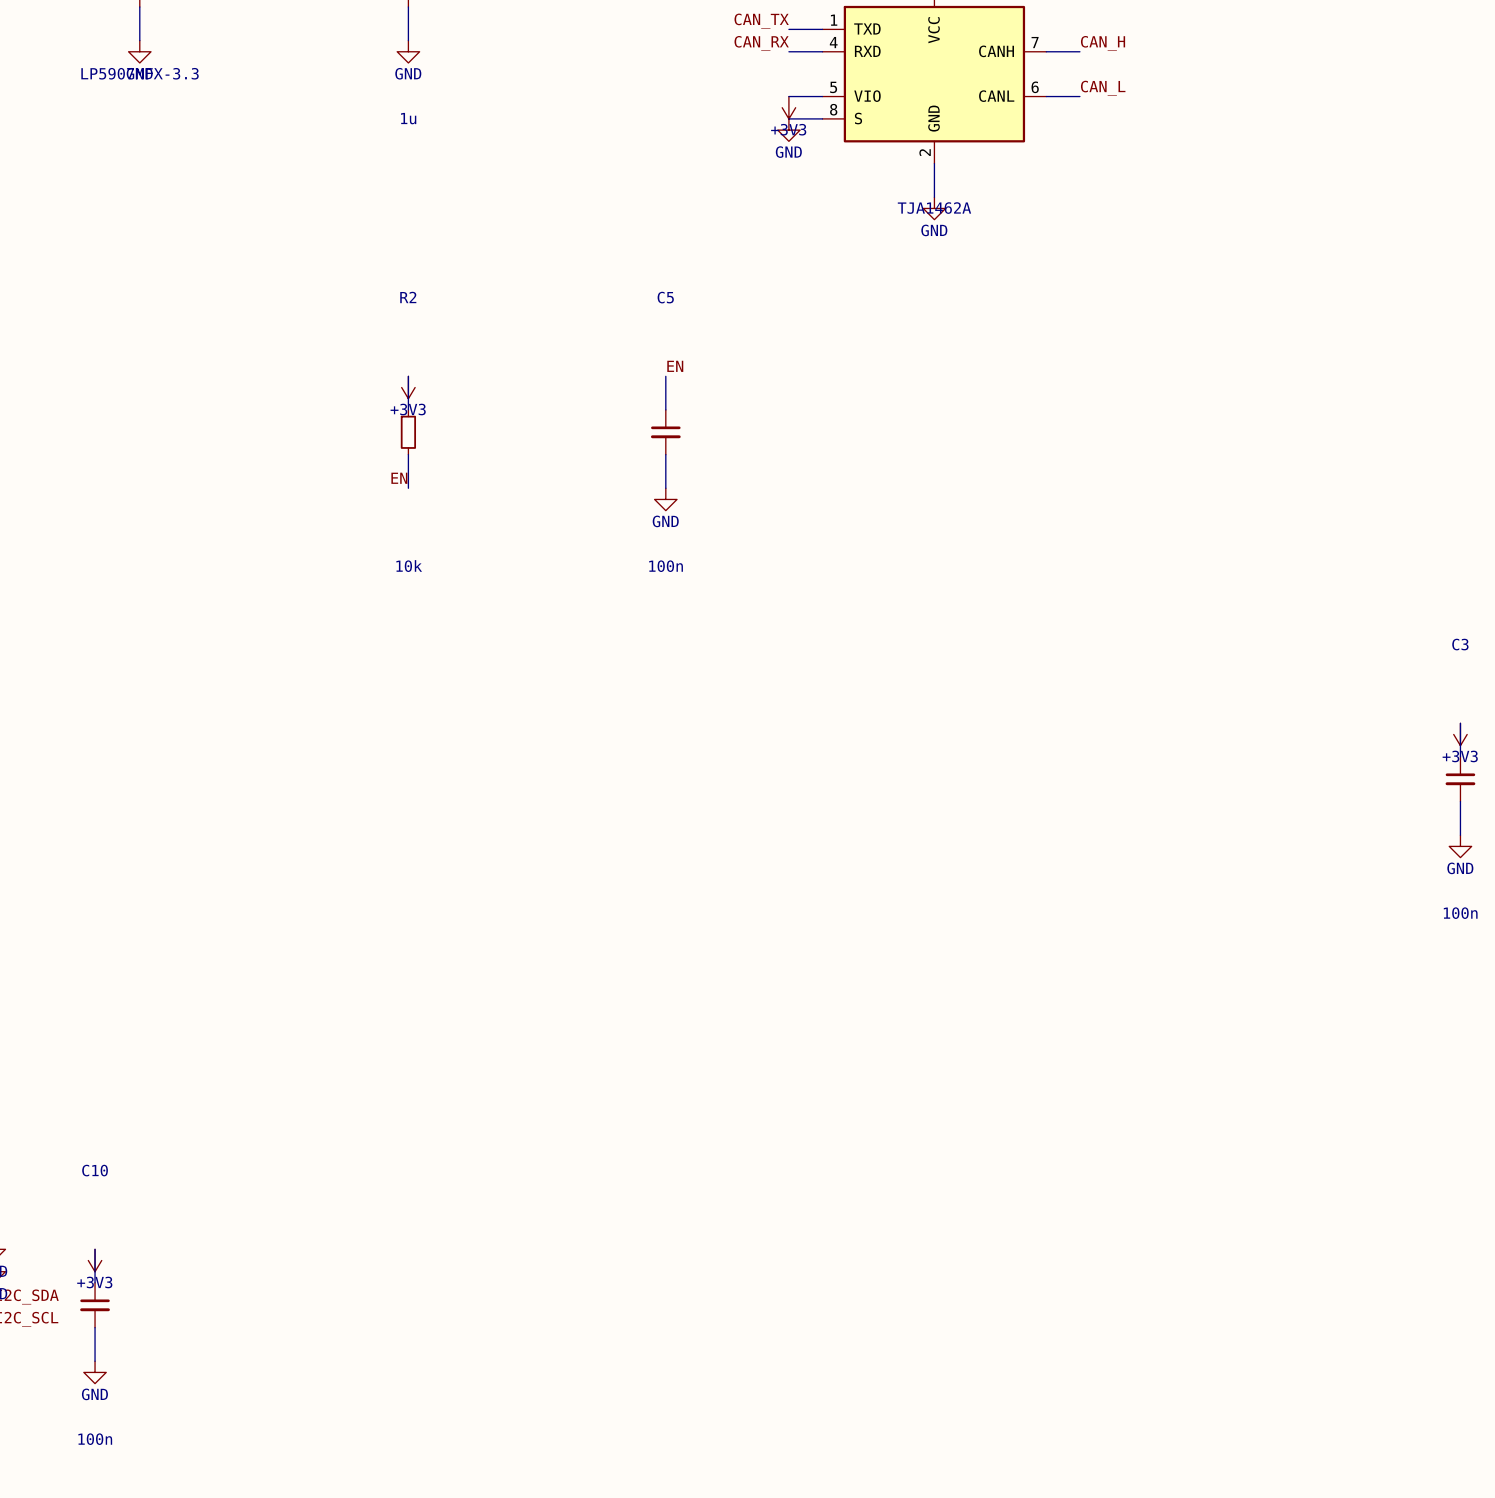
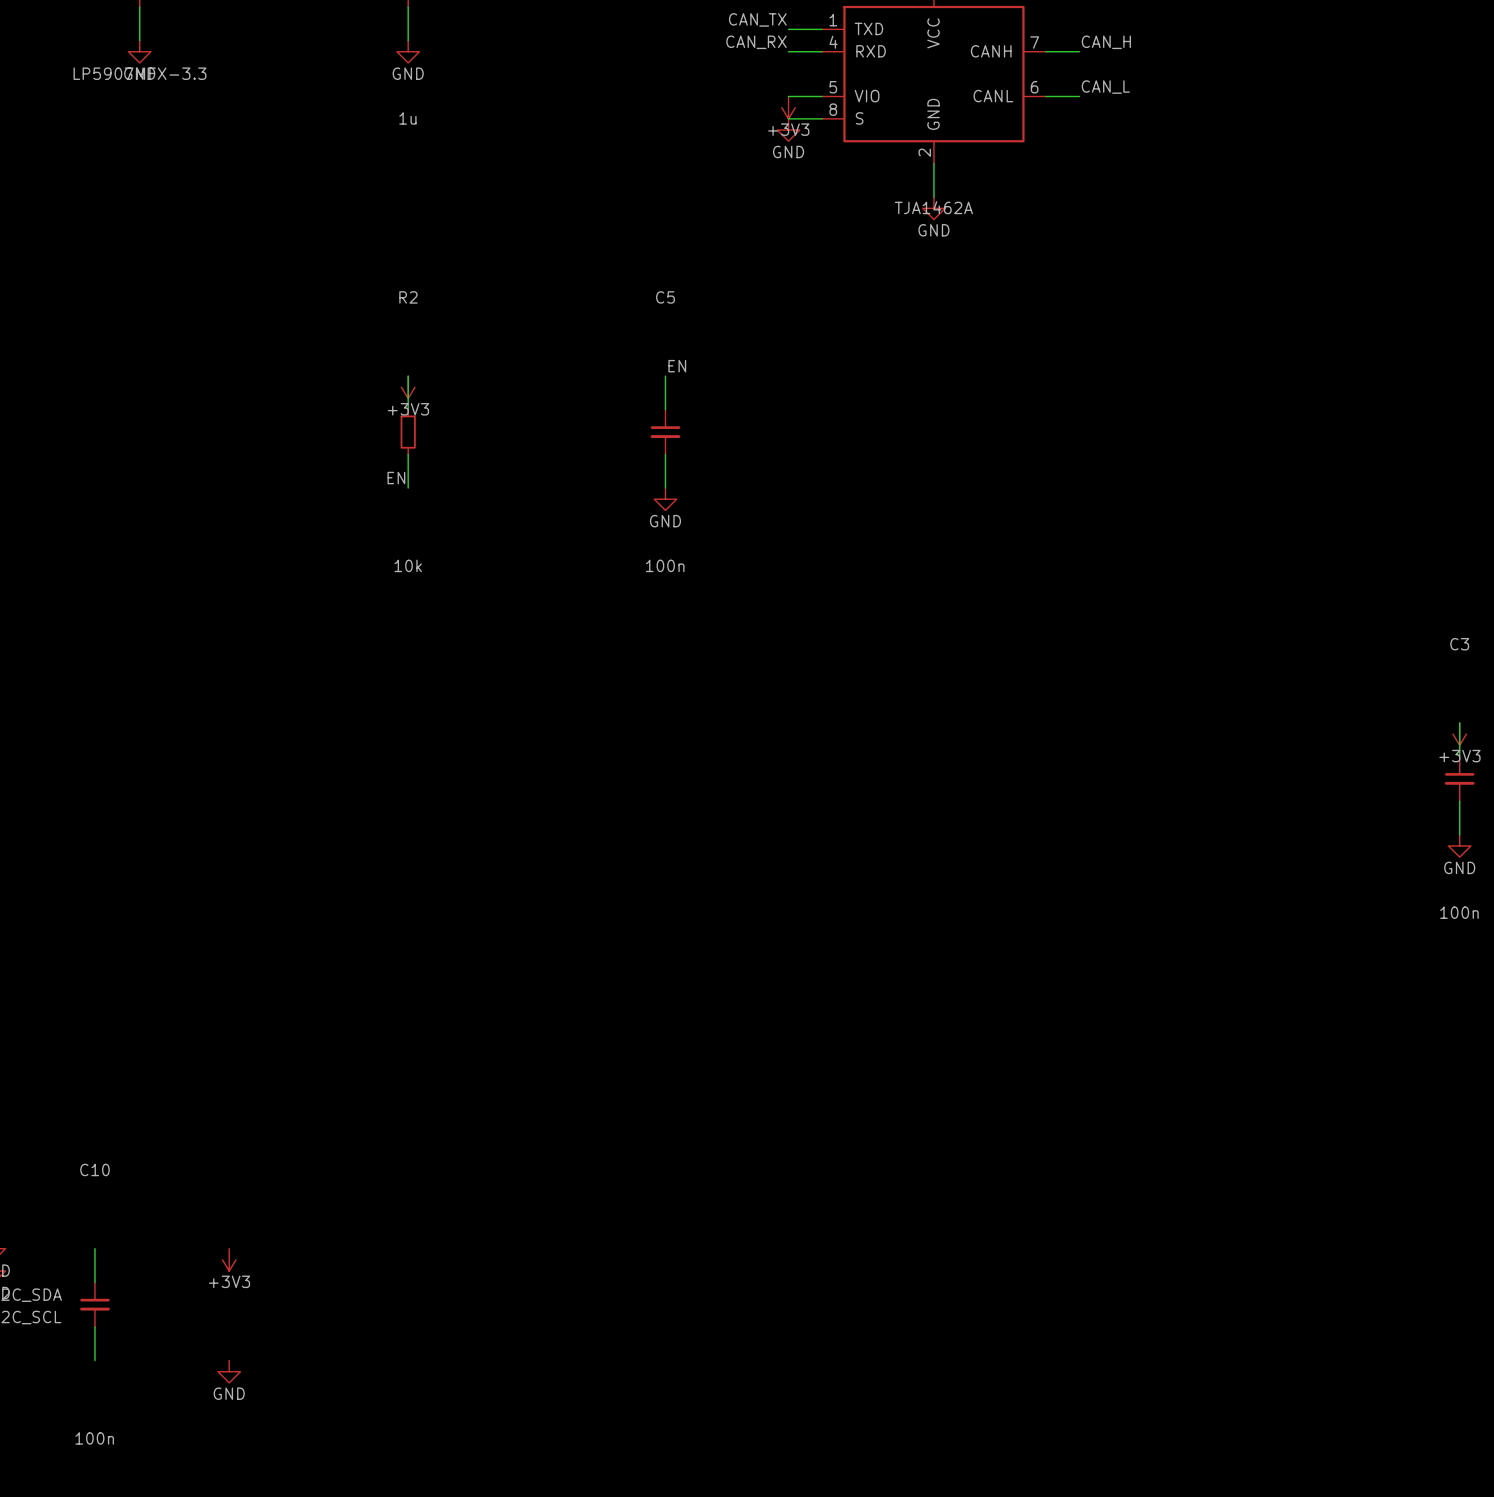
power symbol position: +3V3 (95, 1260) -> +3V3 (229, 1259)
power symbol: GND (95, 1372) -> none
power symbol: none -> GND (229, 1371)

